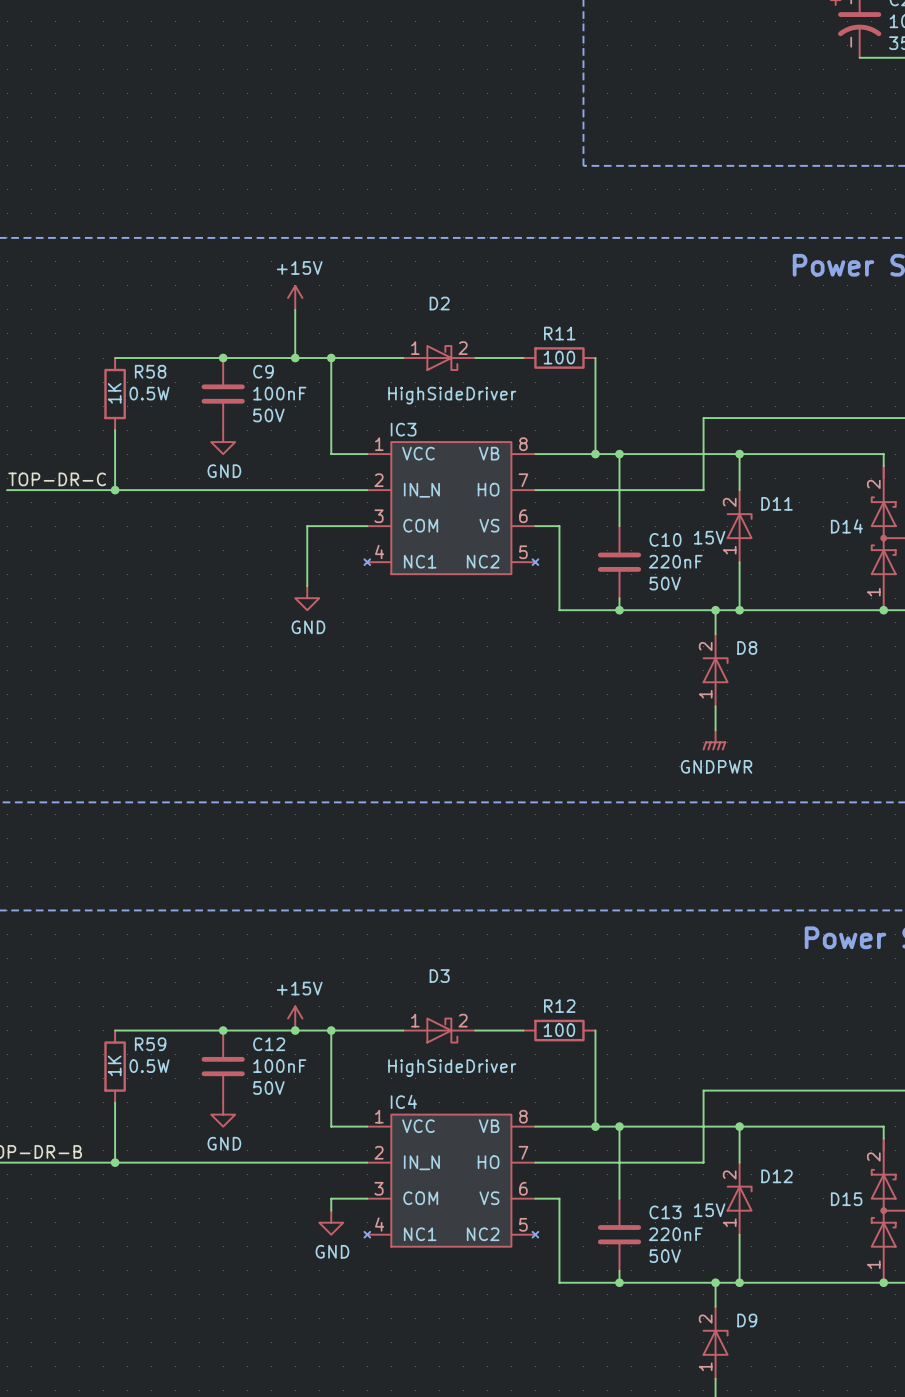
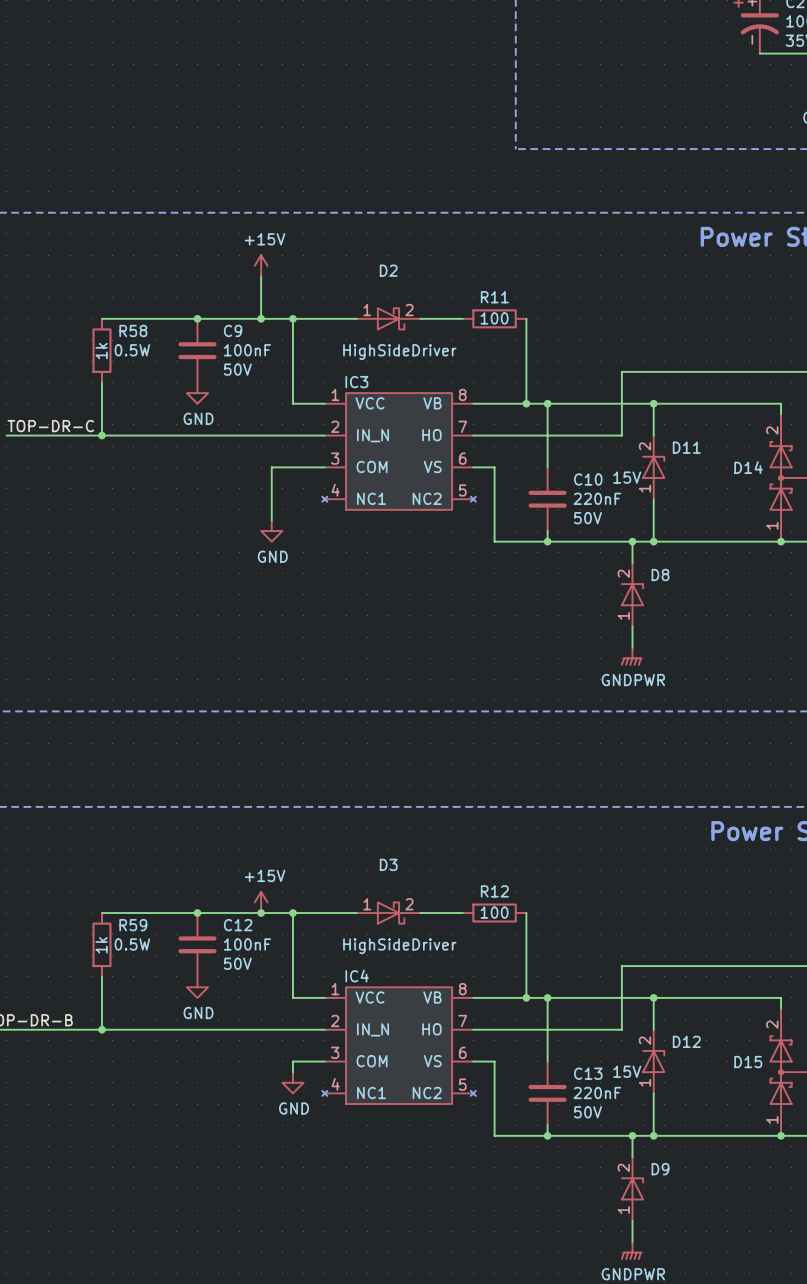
R58 text: 1K (114, 393) -> 1k (101, 351)
R59 text: 1K (114, 1065) -> 1k (101, 945)

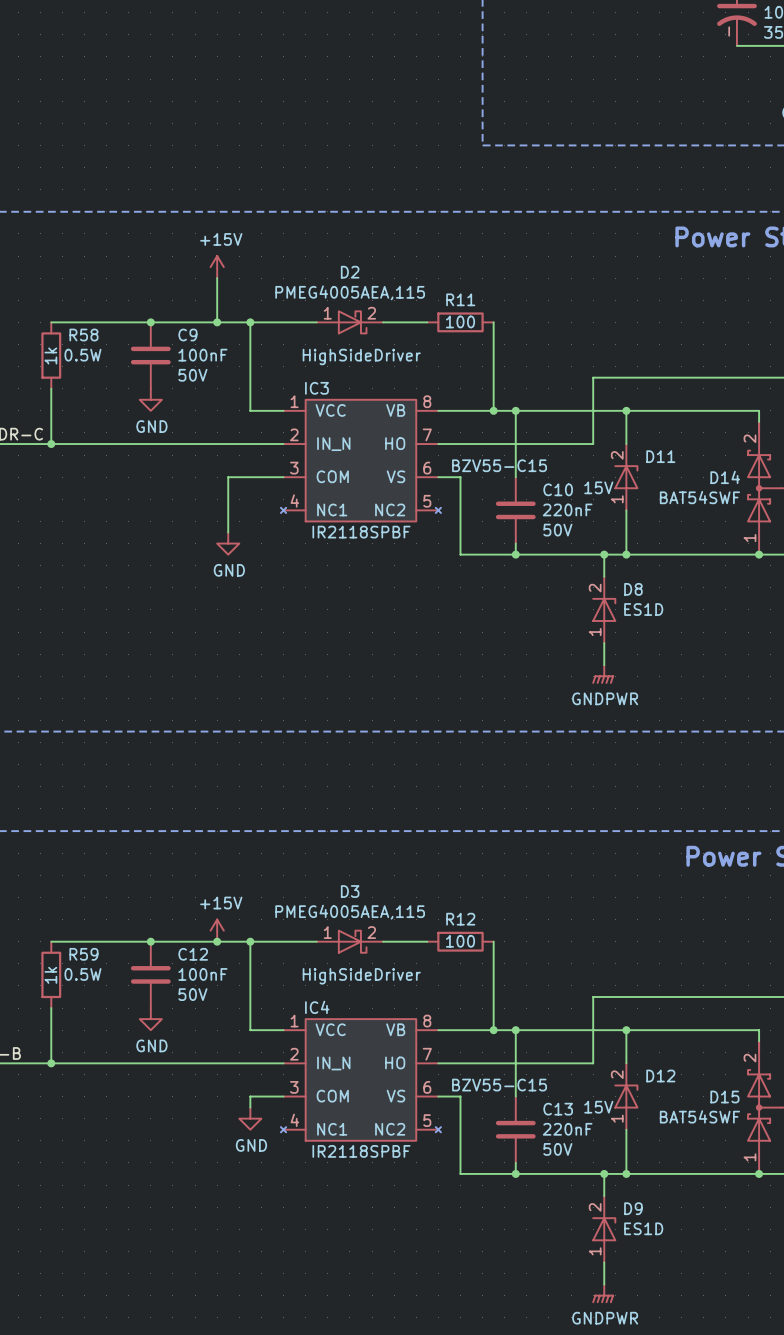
D2 text: none -> PMEG4005AEA,115 (350, 292)
D11 text: none -> BZV55-C15 (499, 465)
D14 text: none -> BAT54SWF (699, 497)
IC3 text: none -> IR2118SPBF (361, 532)
D8 text: none -> ES1D (643, 609)
D3 text: none -> PMEG4005AEA,115 (350, 912)
D12 text: none -> BZV55-C15 (499, 1085)
D15 text: none -> BAT54SWF (699, 1116)
IC4 text: none -> IR2118SPBF (361, 1151)
D9 text: none -> ES1D (643, 1228)

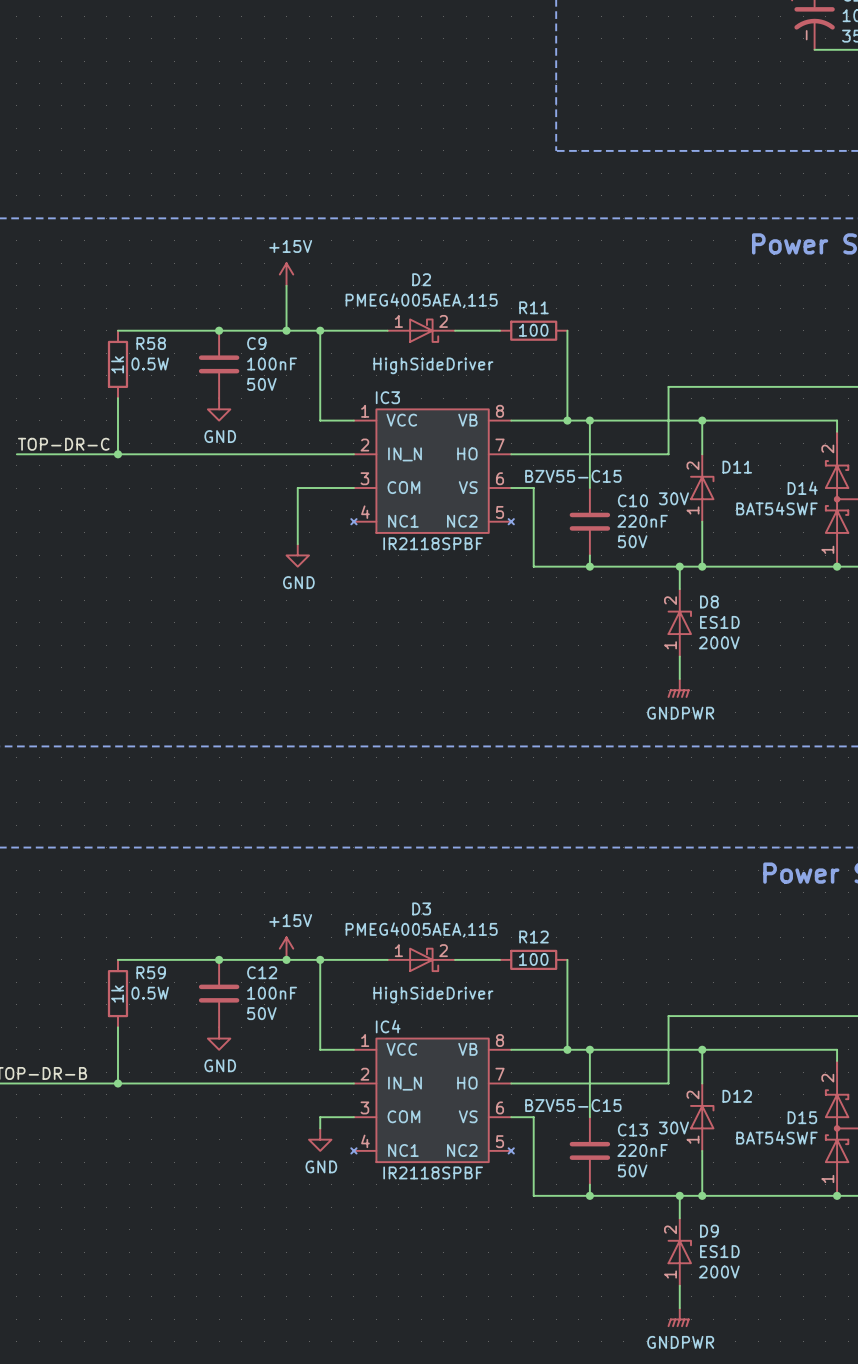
D11 text: 15V (598, 487) -> 30V (673, 498)
D8 text: none -> 200V (719, 642)
D12 text: 15V (598, 1107) -> 30V (673, 1128)
D9 text: none -> 200V (719, 1272)

